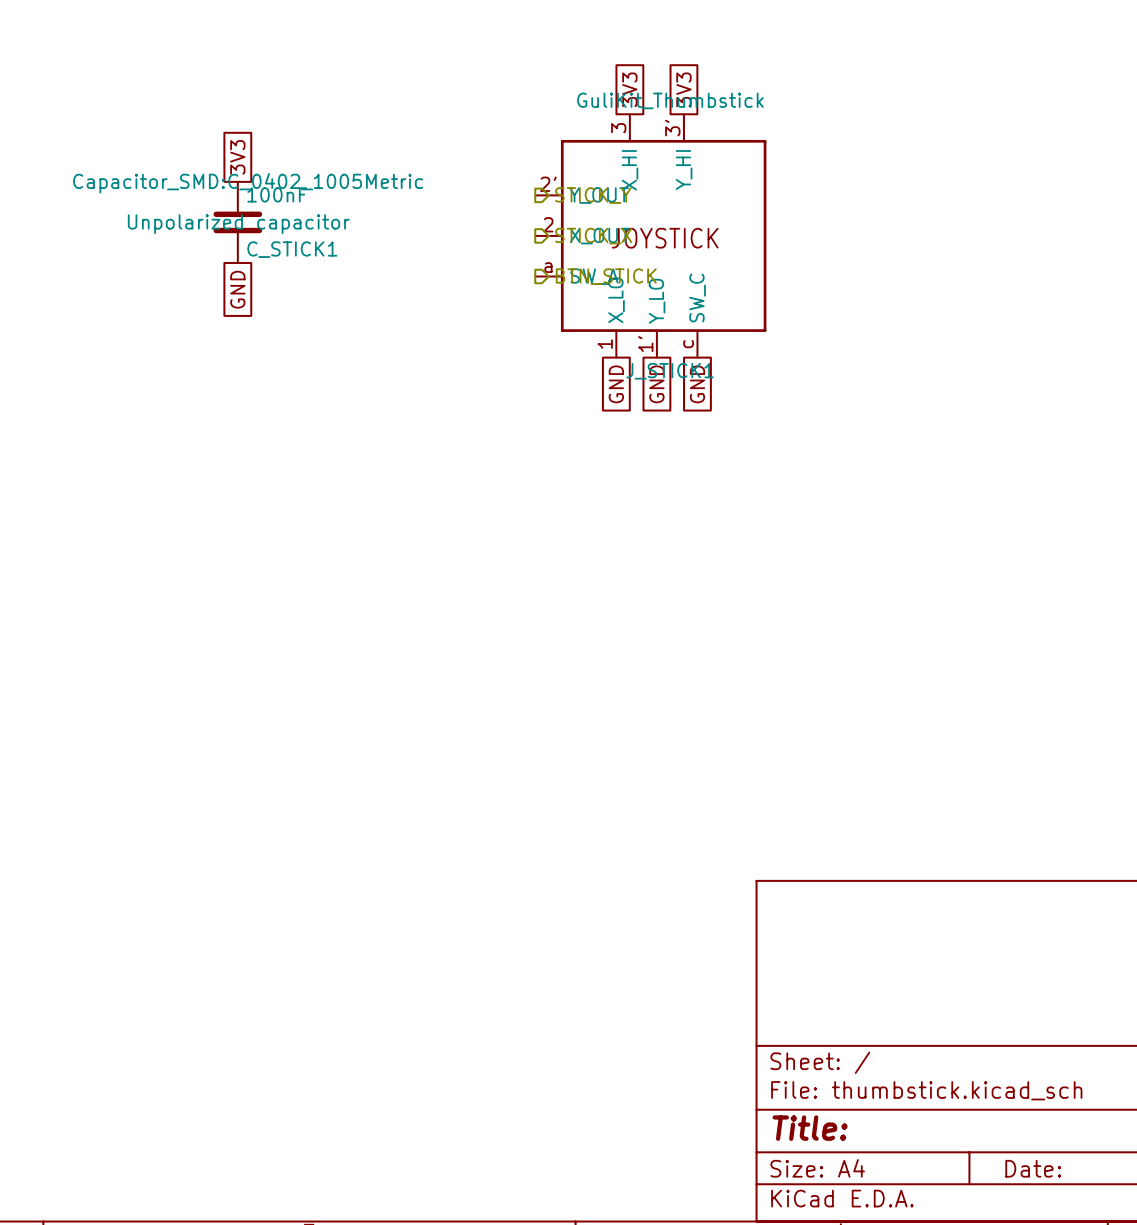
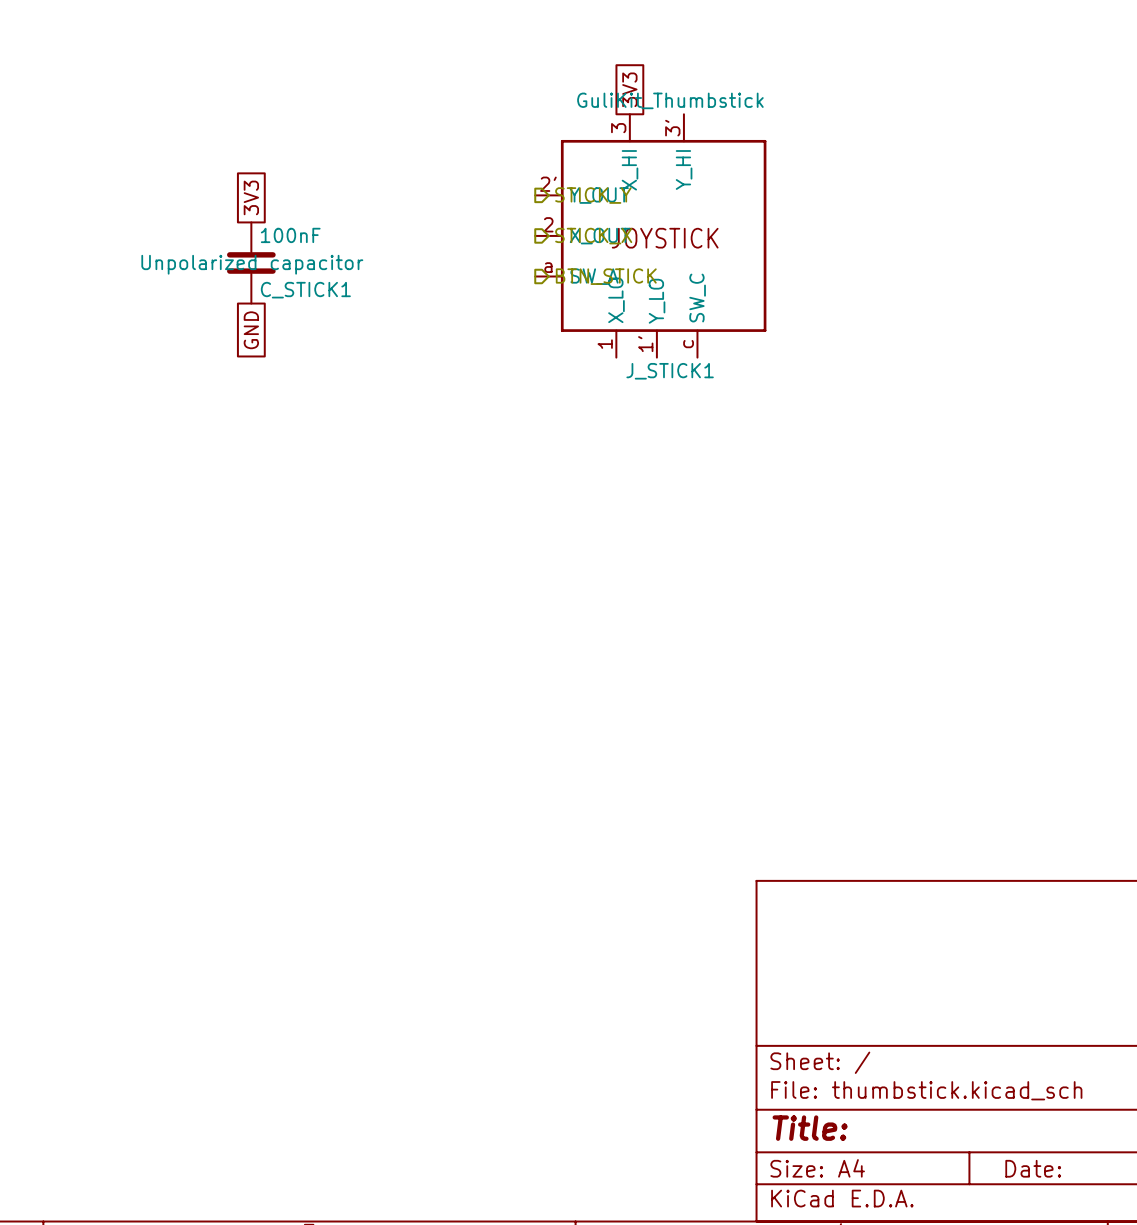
global label: 3V3 (683, 89) -> none
global label position: 3V3 (237, 157) -> 3V3 (251, 197)
C_STICK1 text: Capacitor_SMD:C_0402_1005Metric (248, 183) -> none
C_STICK1 position: (237, 222) -> (251, 262)
global label position: GND (237, 289) -> GND (251, 330)
global label: GND (616, 384) -> none
global label: GND (656, 384) -> none
global label: GND (697, 384) -> none

